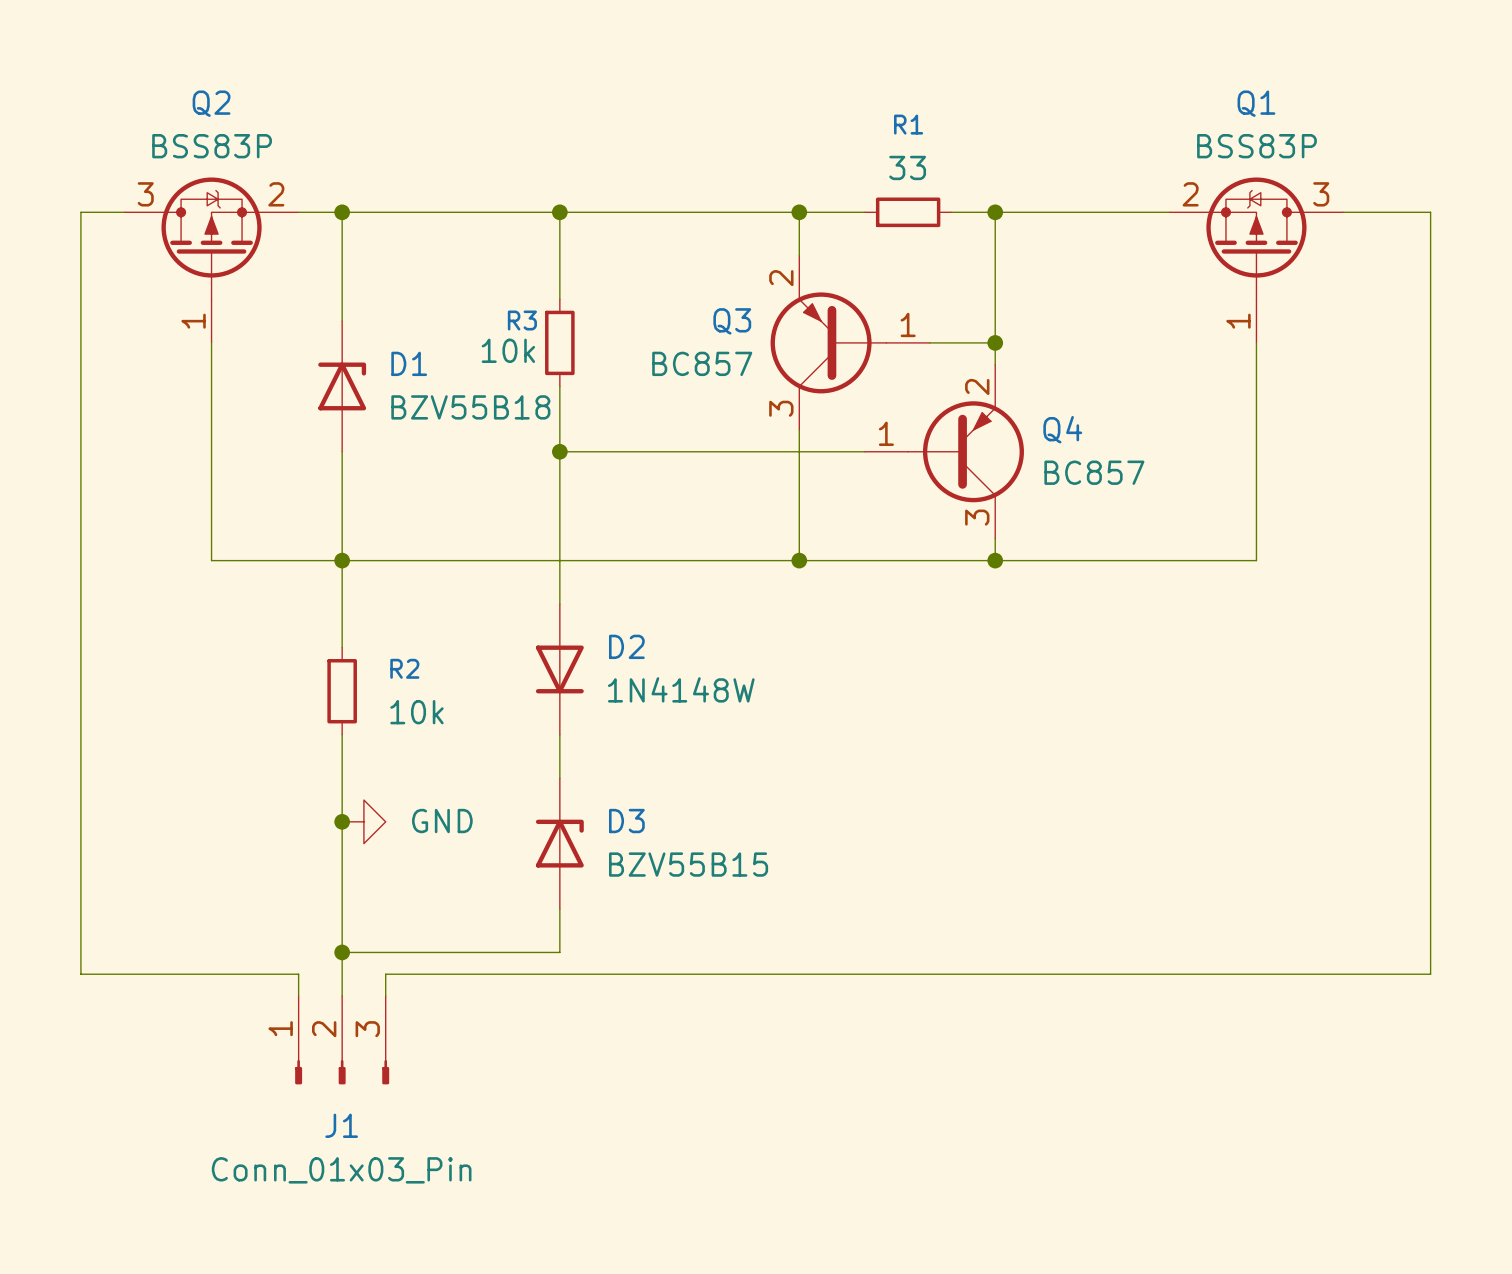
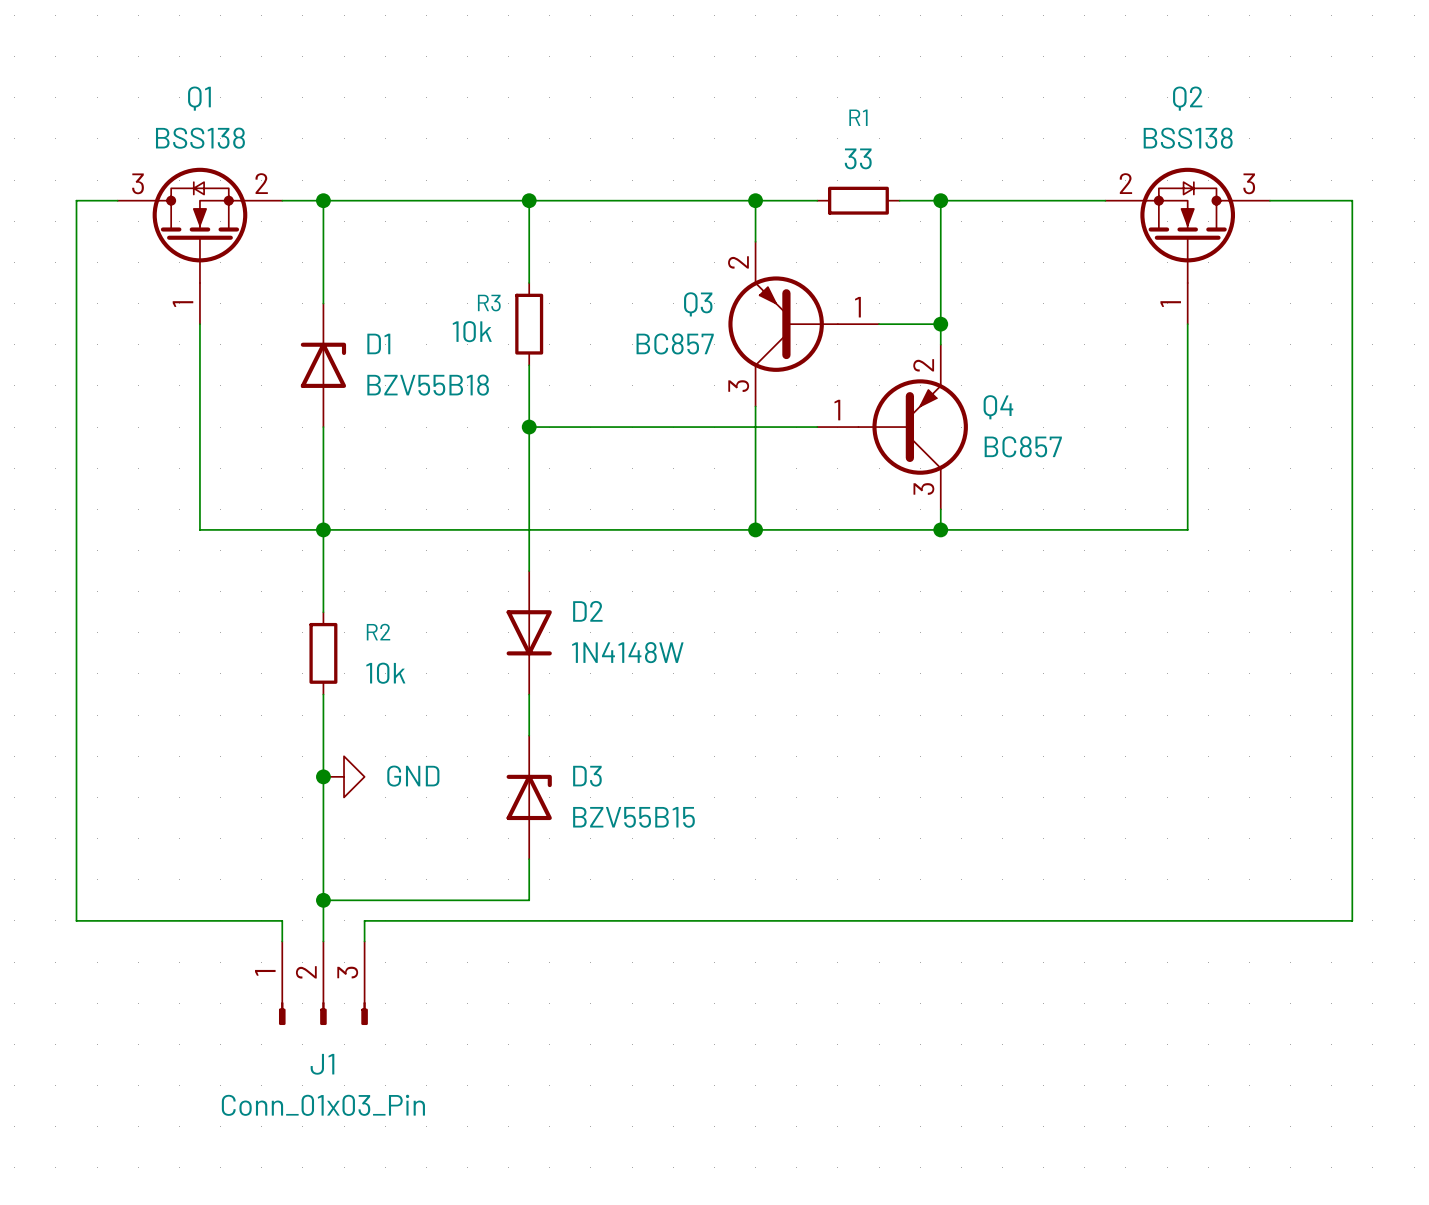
Q2 value: BSS83P (212, 146) -> BSS138 (1188, 138)
Q1 value: BSS83P (1256, 146) -> BSS138 (200, 138)
Q2 symbol: [124, 177, 299, 343] -> [1105, 167, 1271, 325]
Q1 symbol: [1169, 177, 1344, 343] -> [117, 167, 283, 325]

